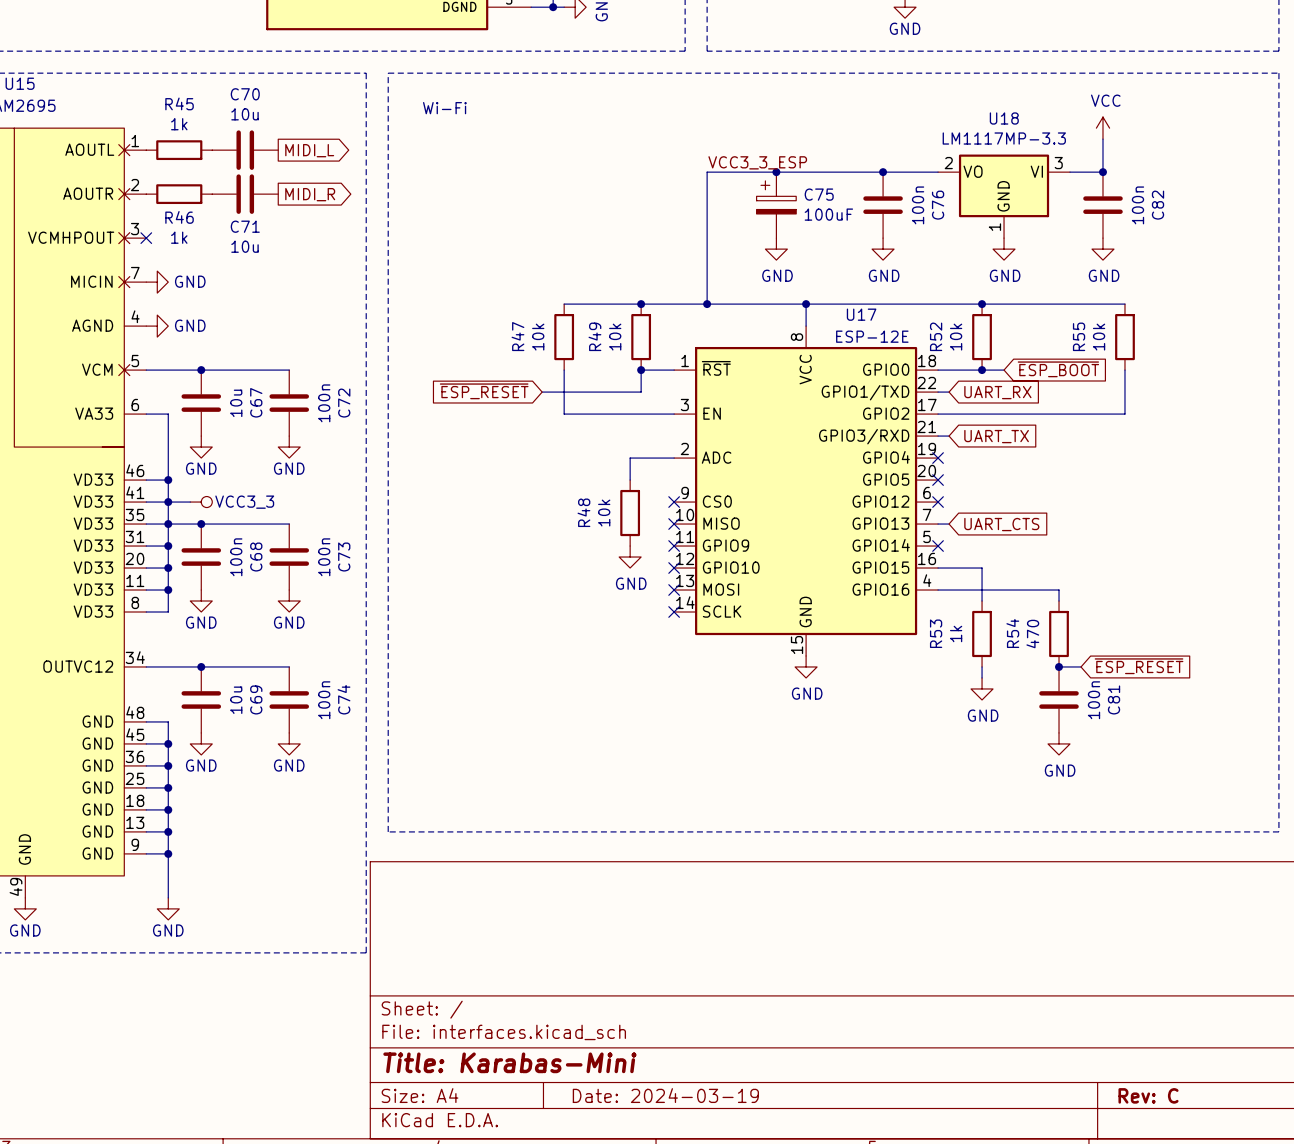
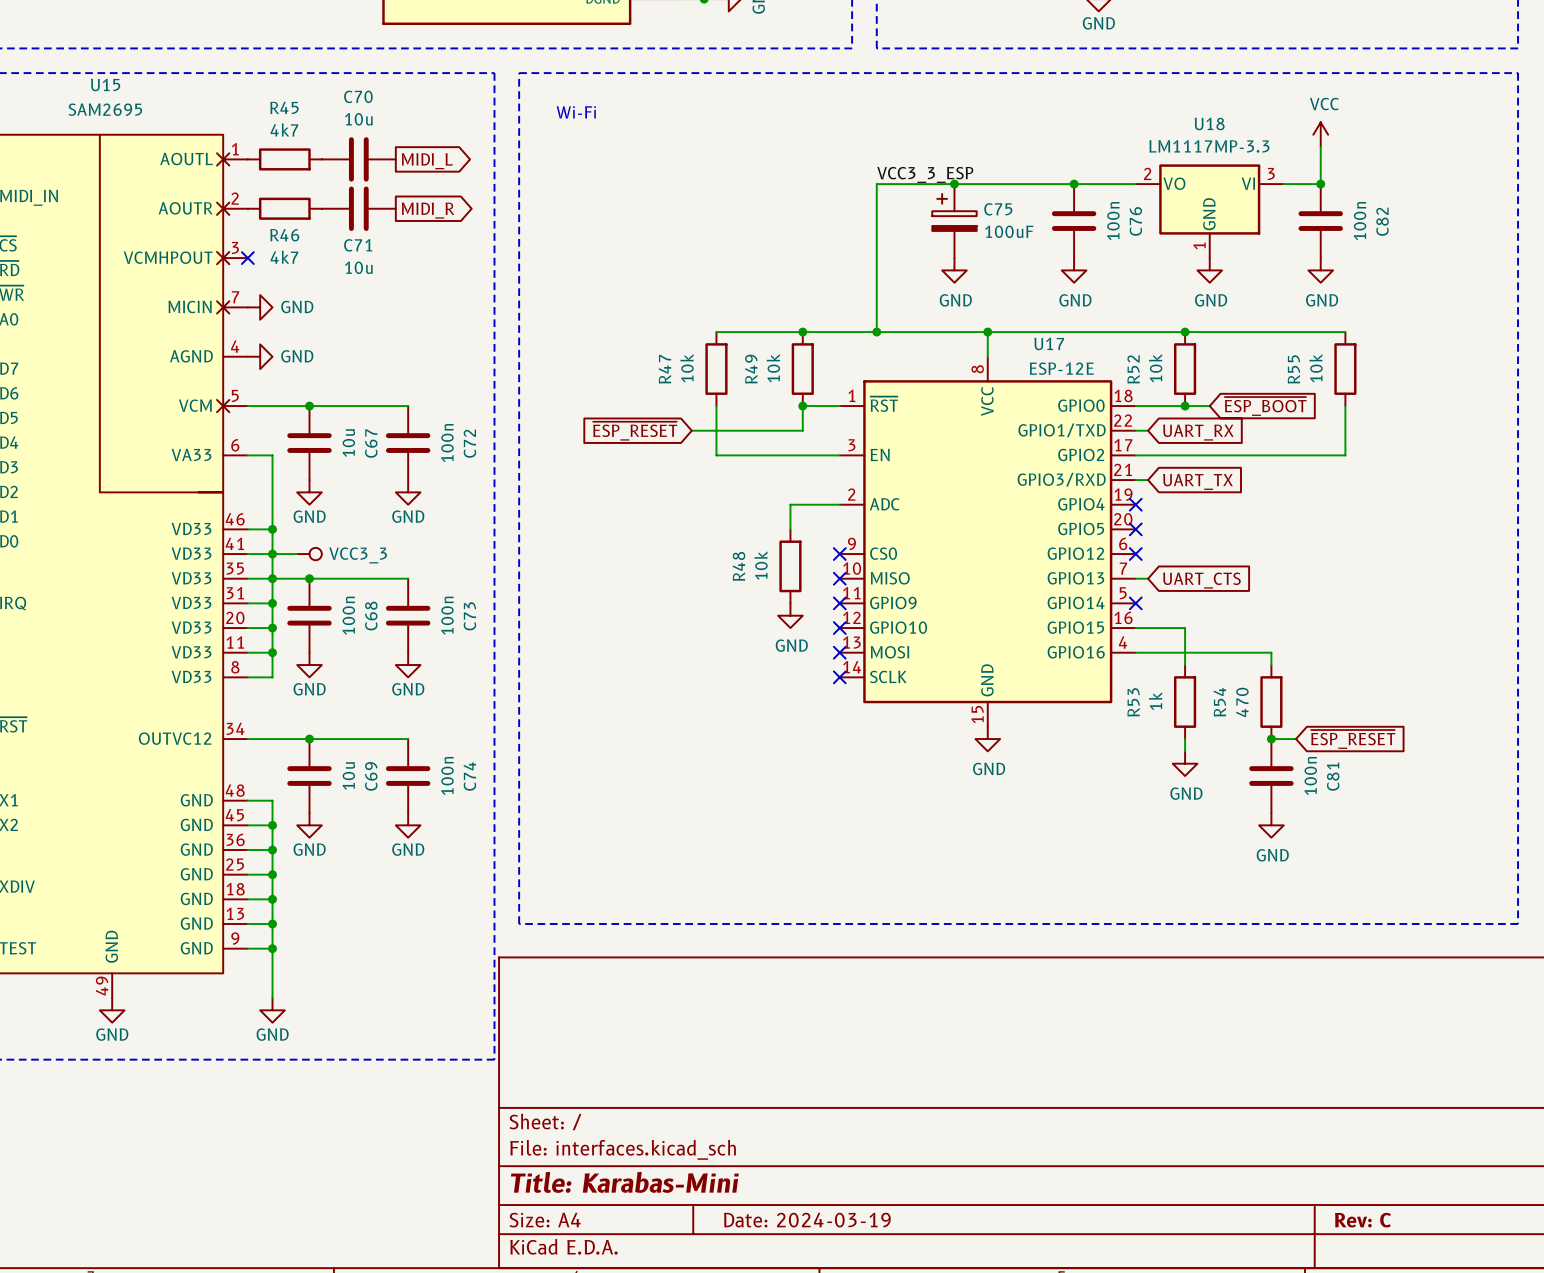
R45 value: 1k (179, 124) -> 4k7 (284, 129)
R46 value: 1k (179, 237) -> 4k7 (284, 257)

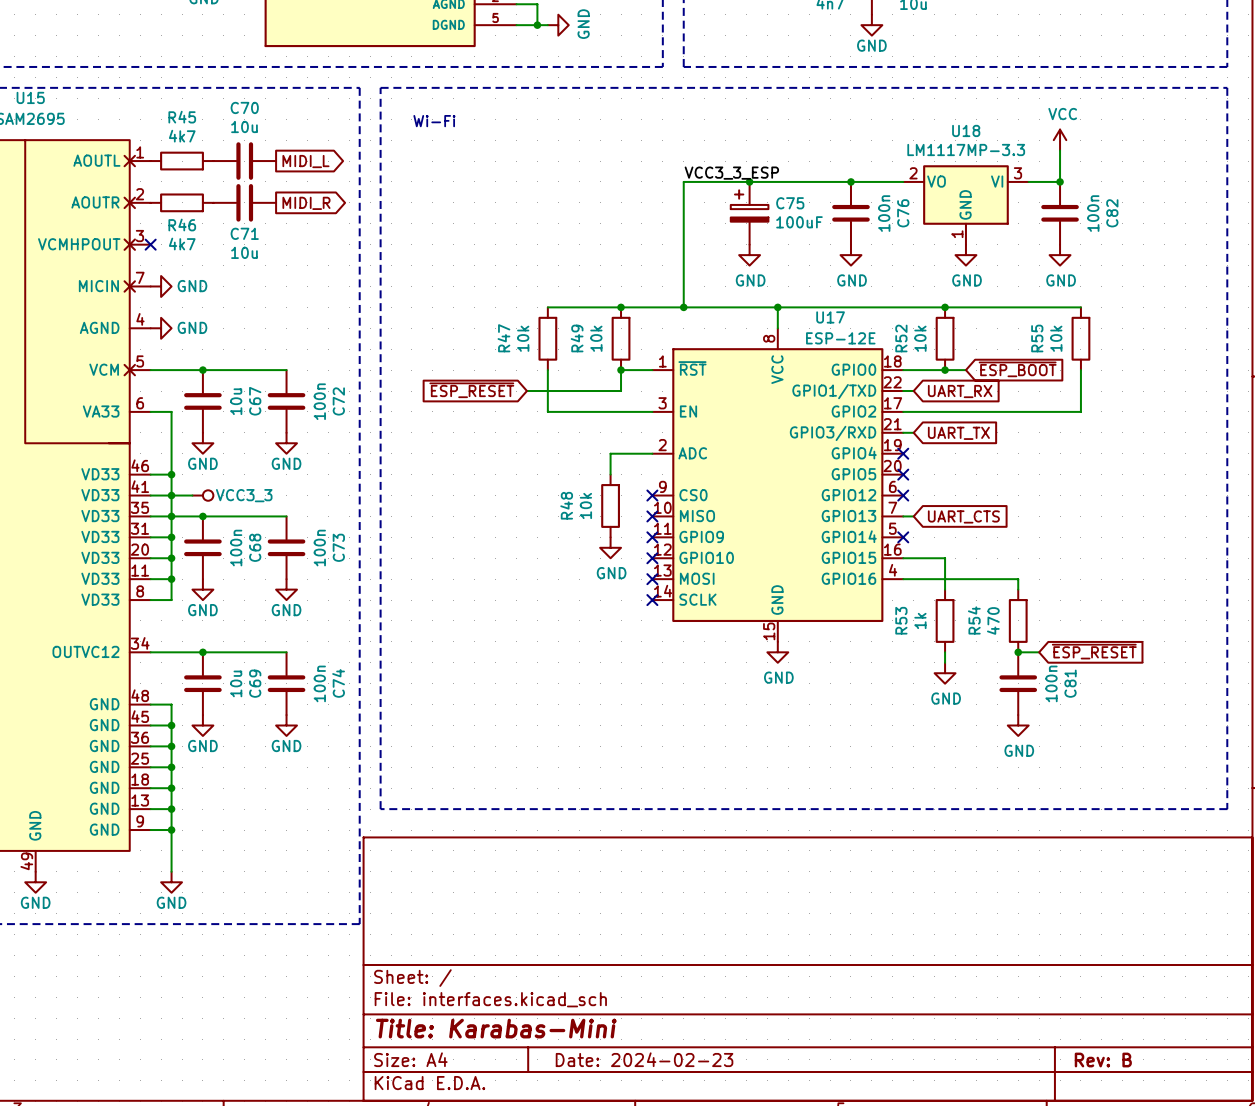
title block: Date: 2024-03-19 (807, 1220) -> Date: 2024-02-23 (644, 1059)
title block: Rev: C (1362, 1220) -> Rev: B (1103, 1060)

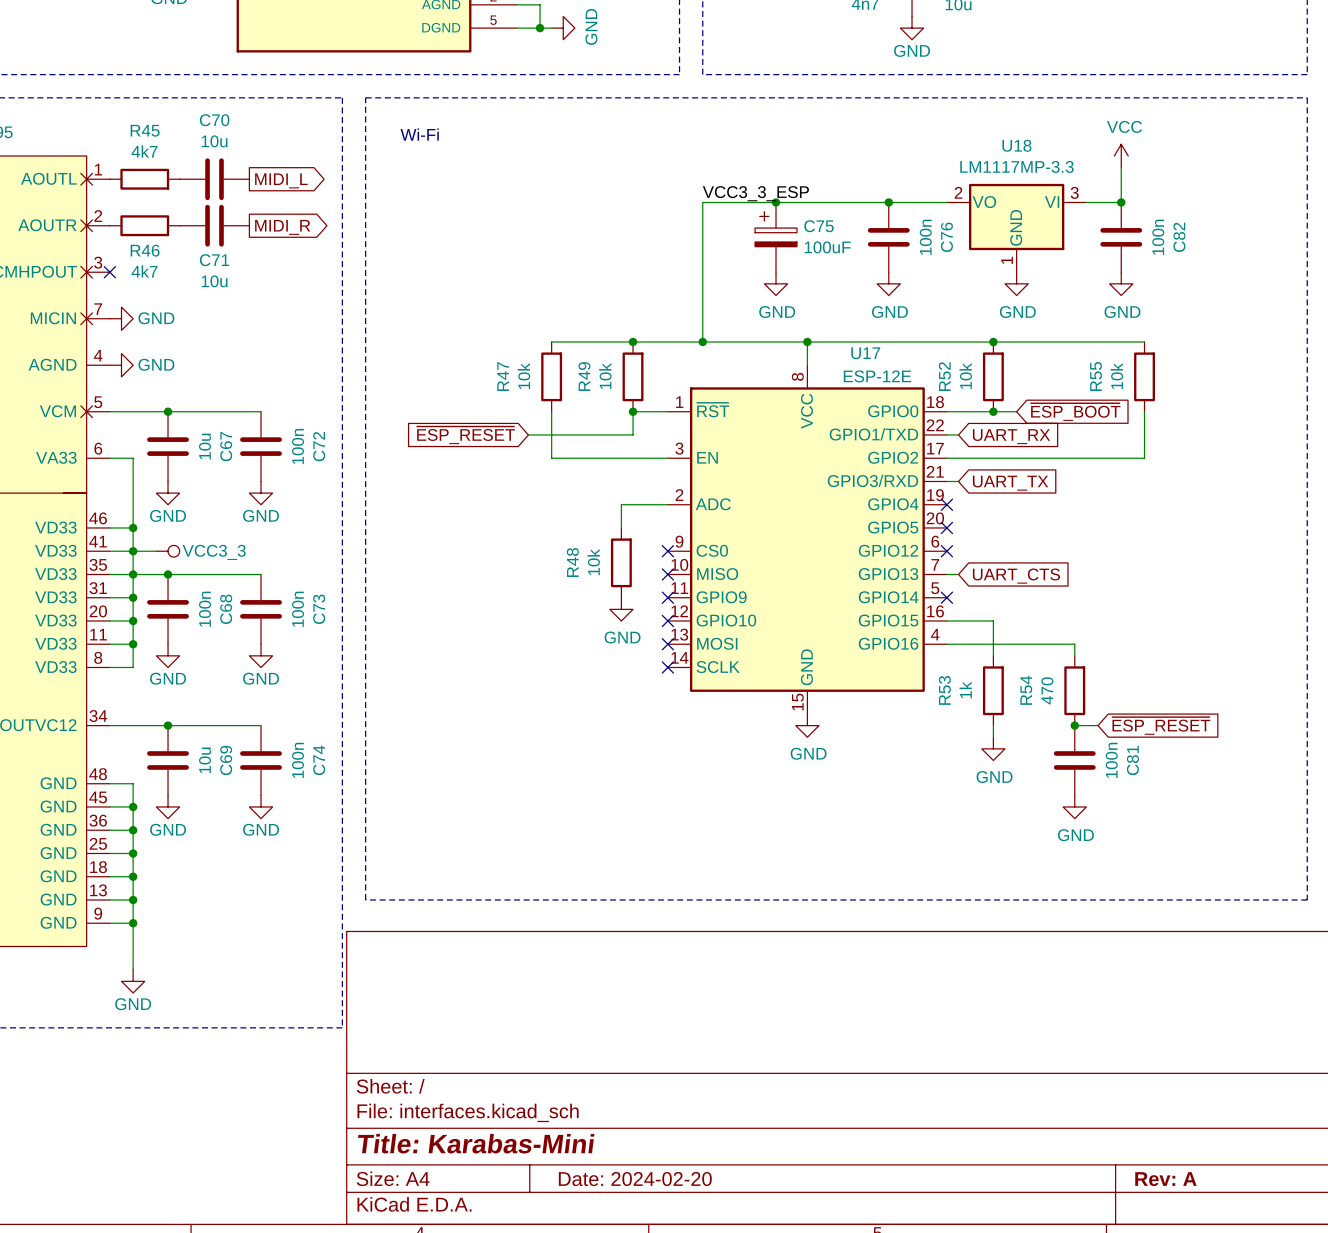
title block: Date: 2024-02-23 (644, 1059) -> Date: 2024-02-20 (635, 1179)
title block: Rev: B (1103, 1060) -> Rev: A (1165, 1179)

